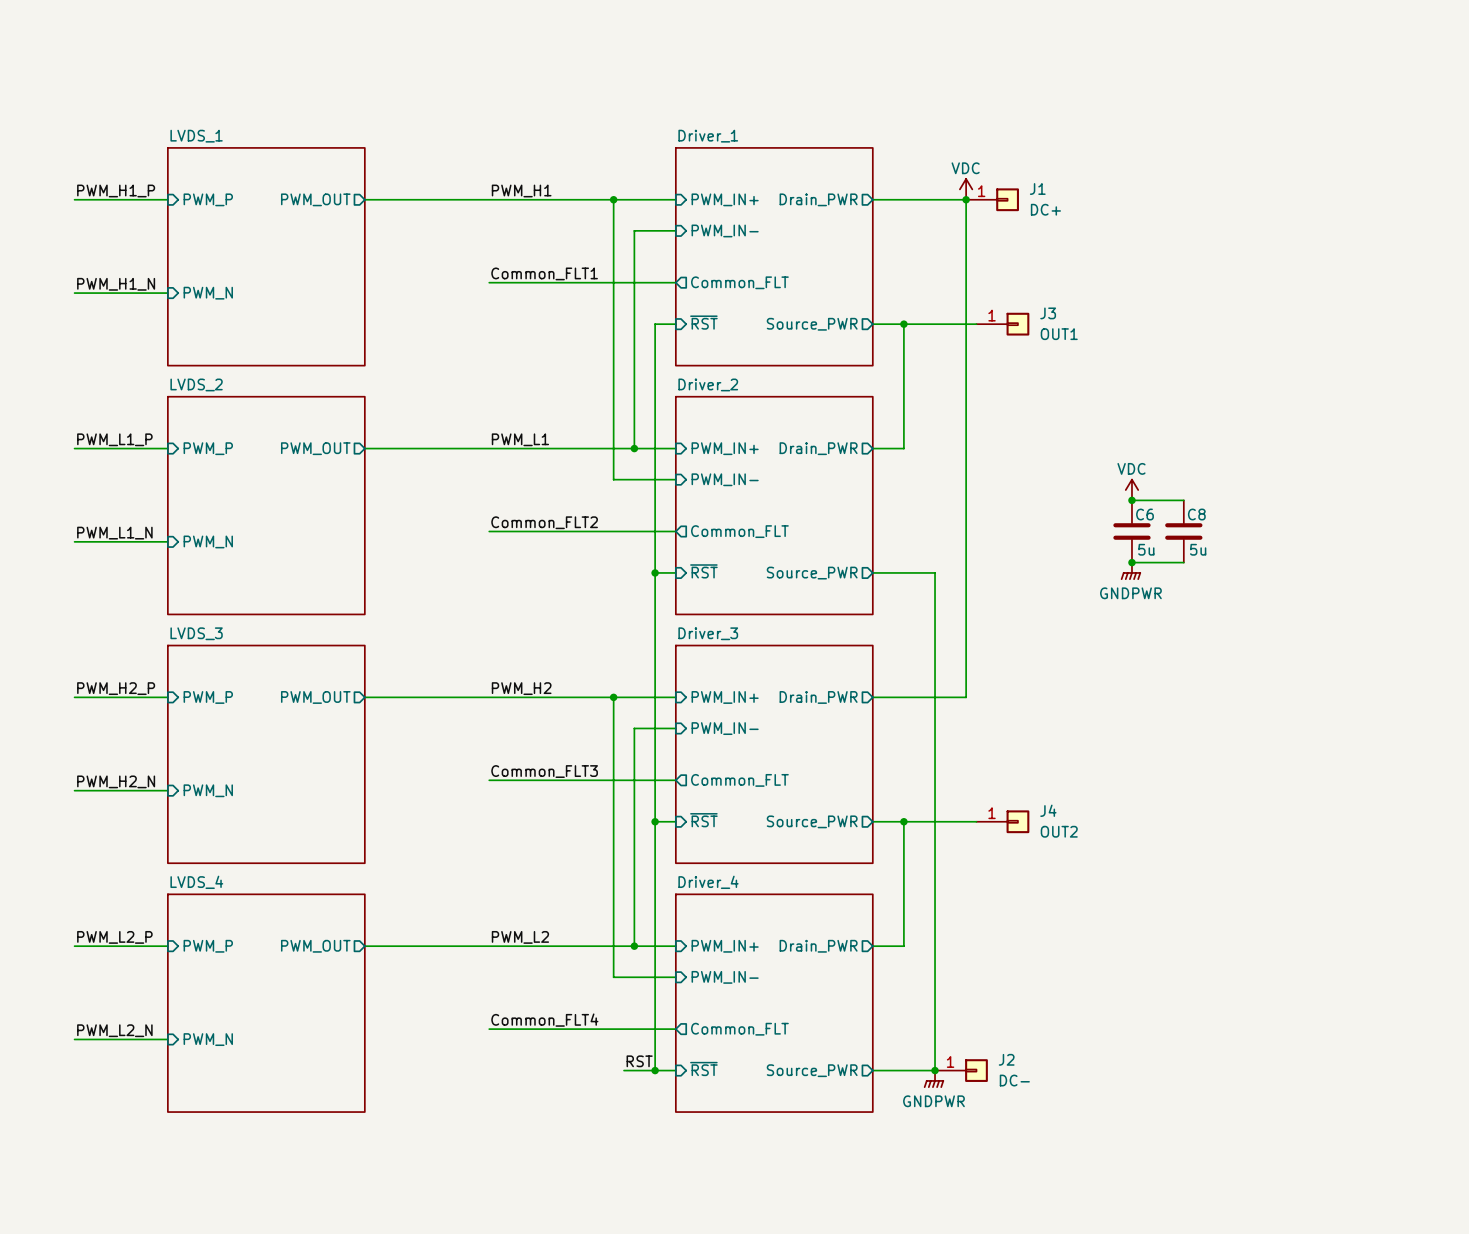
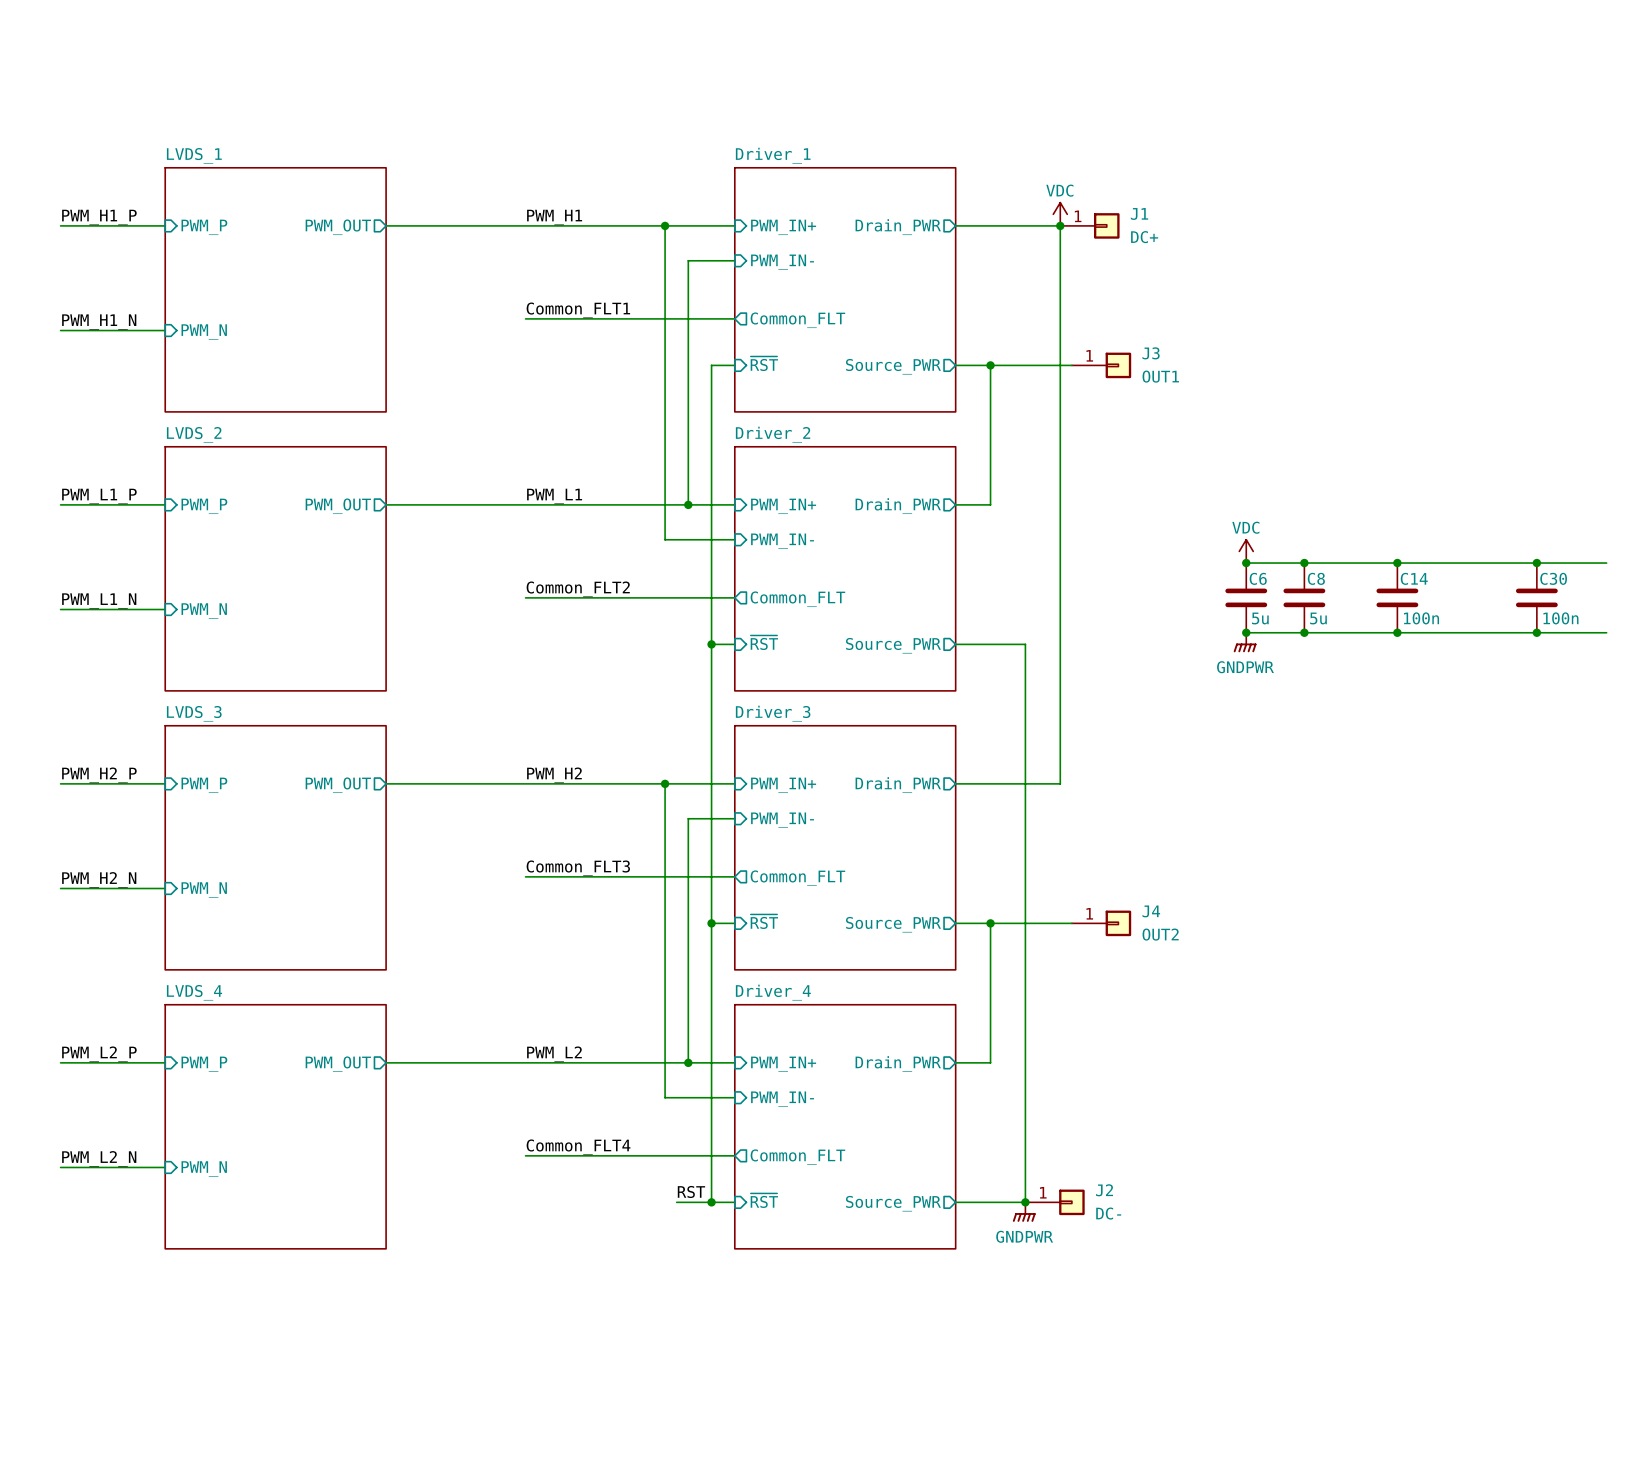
wire: none -> (1304, 563) (1606, 563)
junction: none -> (1304, 563)
junction: none -> (1397, 563)
junction: none -> (1536, 563)
C14: none -> 100n (1397, 597)
C30: none -> 100n (1536, 597)
wire: none -> (1304, 632) (1606, 632)
junction: none -> (1304, 632)
junction: none -> (1397, 632)
junction: none -> (1536, 632)

